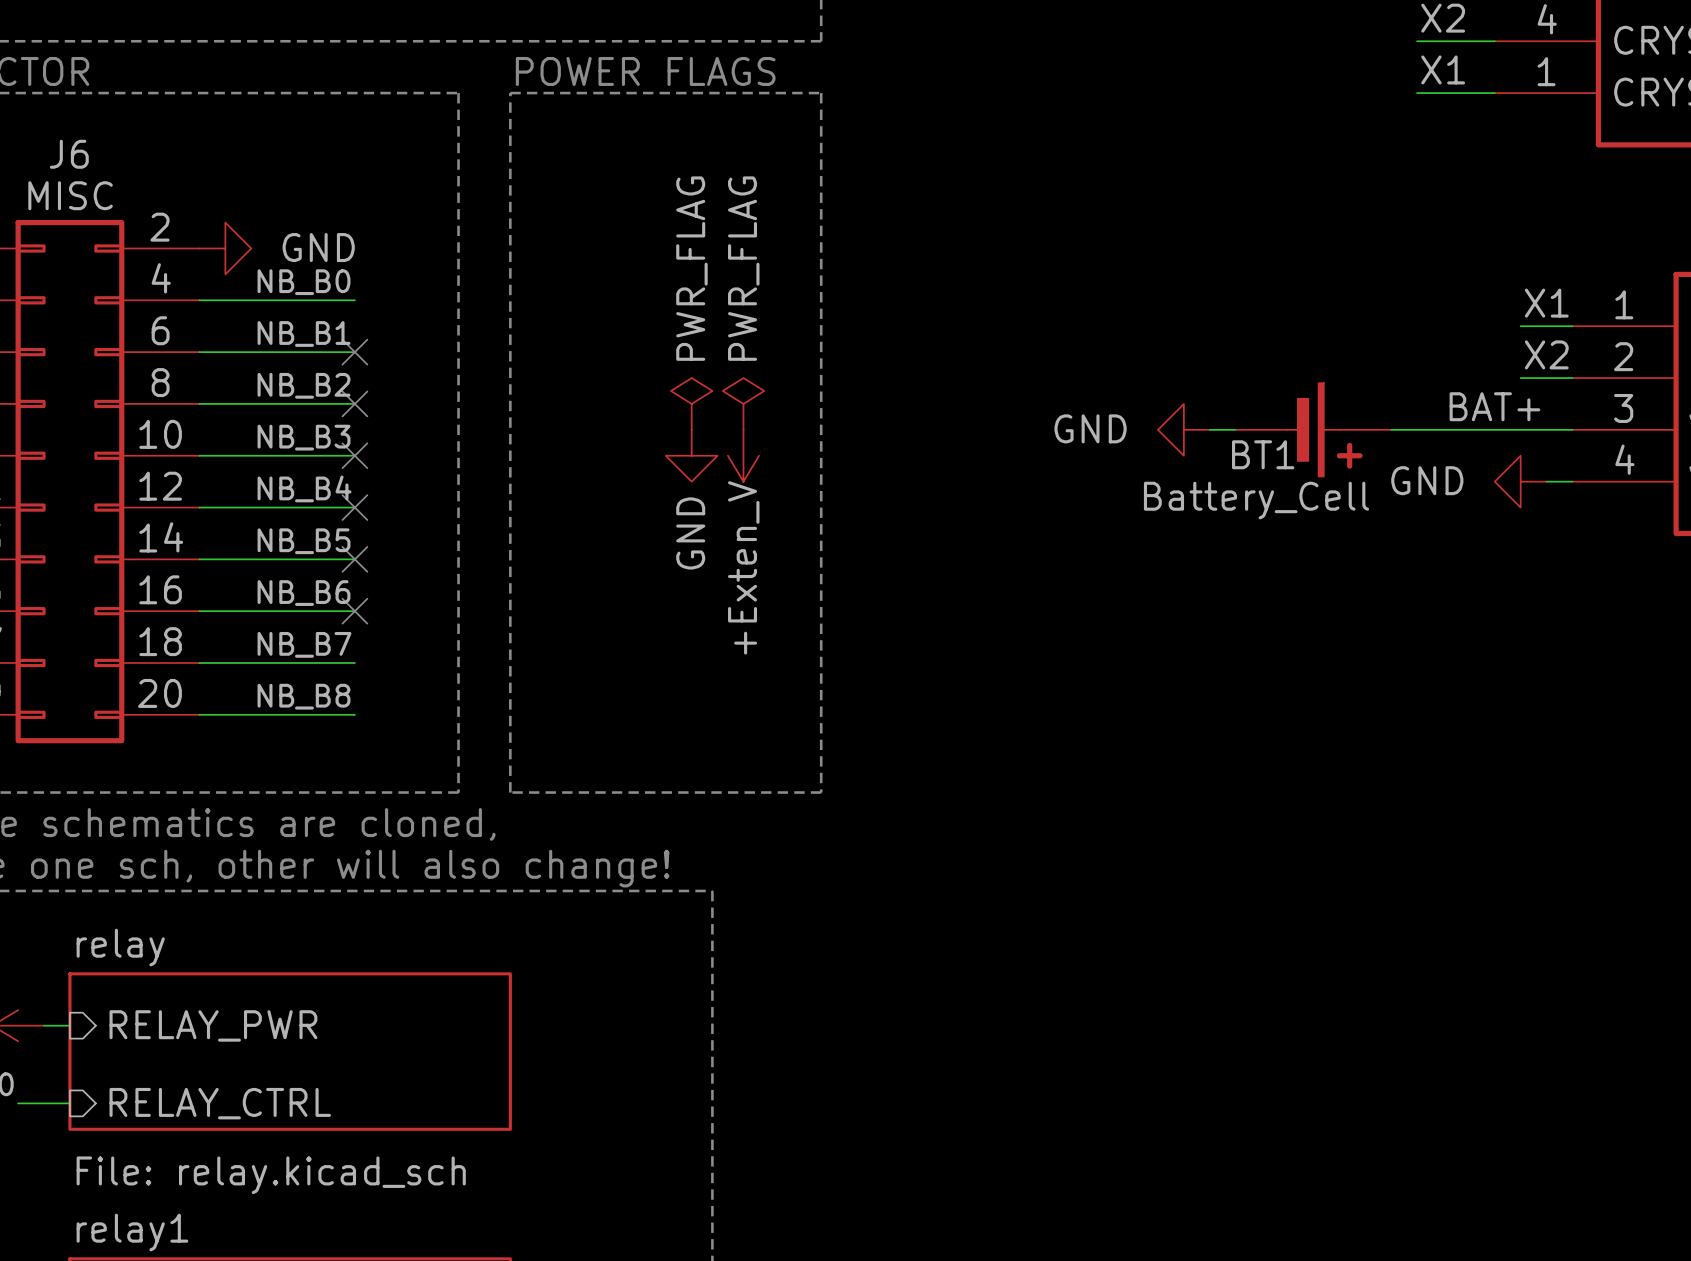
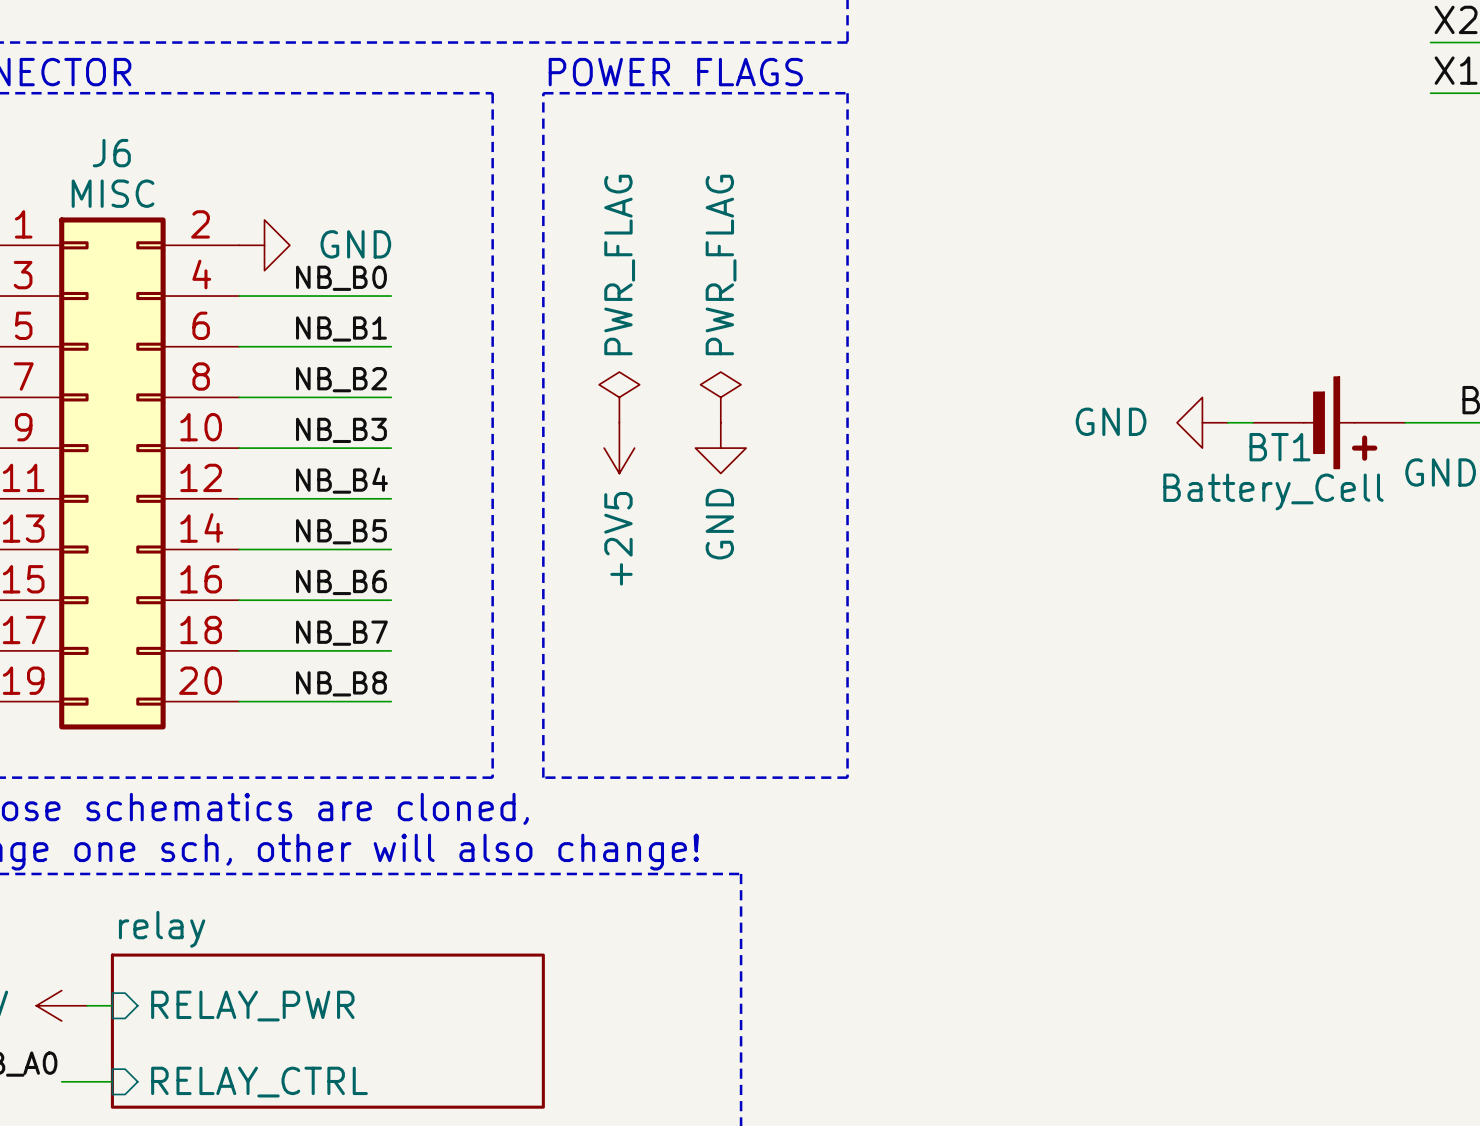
no-connect mark: (354, 352) -> none
no-connect mark: (354, 403) -> none
power symbol position: PWR_FLAG (743, 403) -> PWR_FLAG (619, 397)
no-connect mark: (354, 455) -> none
power symbol: none -> +2V5 (619, 448)
power symbol: +Exten_V (743, 455) -> none
no-connect mark: (354, 507) -> none
no-connect mark: (354, 559) -> none
no-connect mark: (354, 611) -> none

